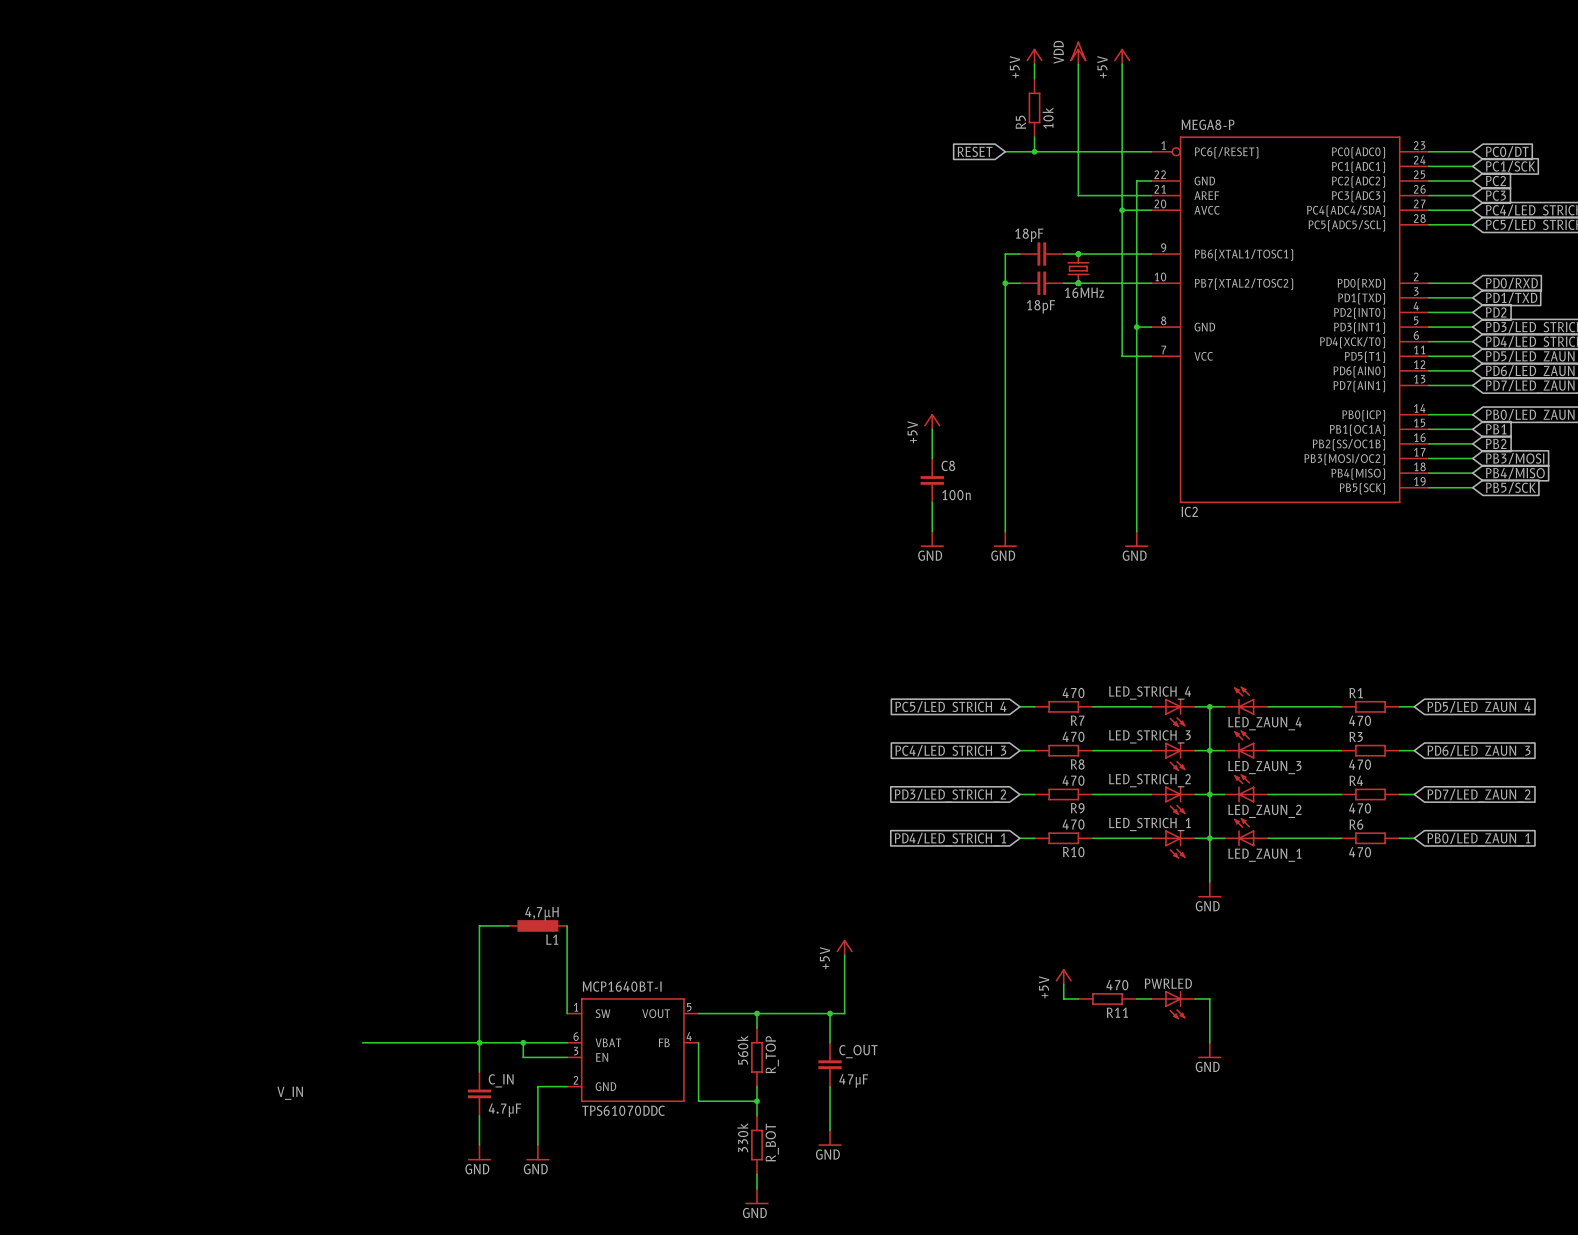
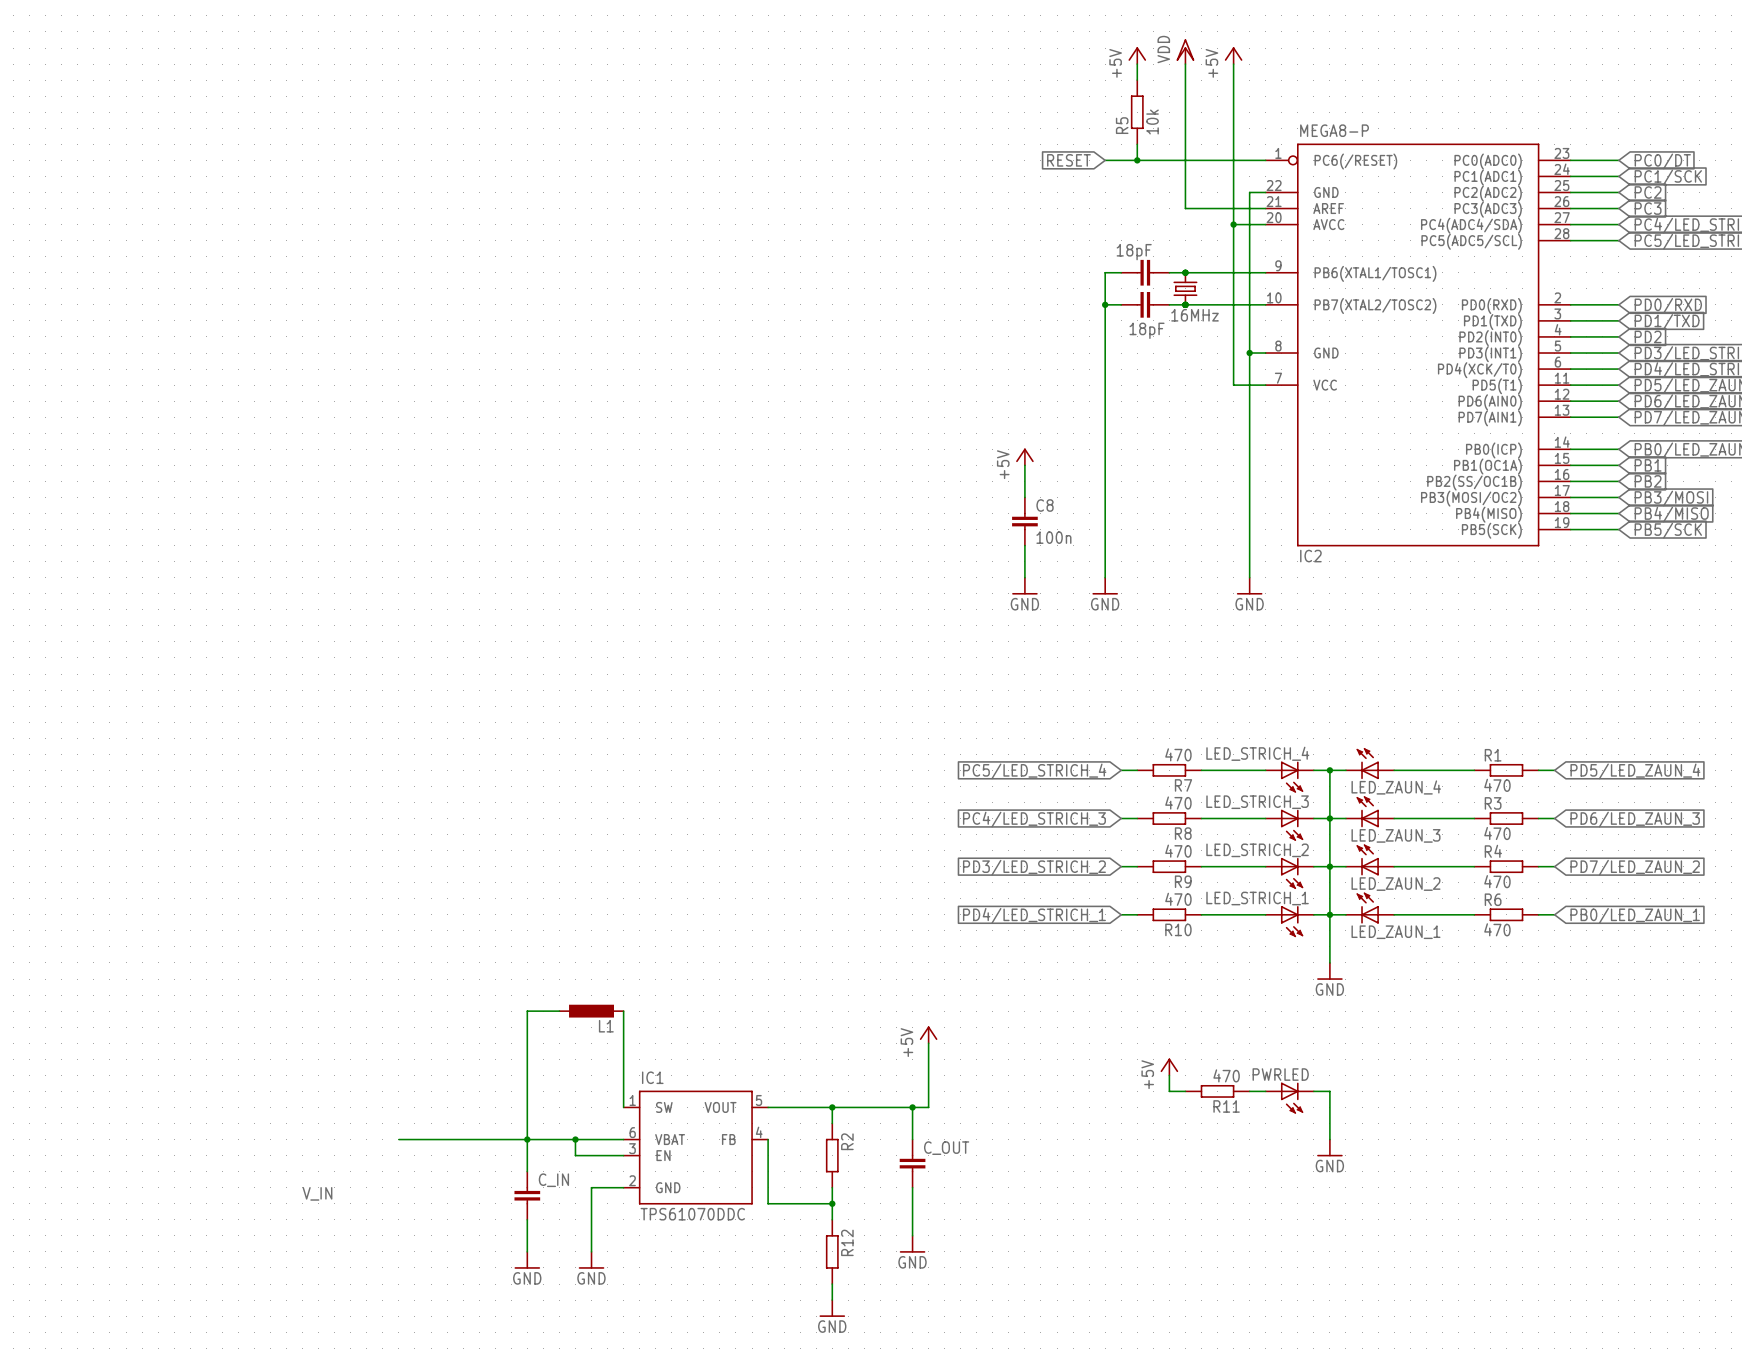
L1 value: 4,7µH (542, 913) -> none
MCP1640BT-I name: MCP1640BT-I (622, 986) -> IC1 (652, 1077)
R_TOP value: 560k (742, 1050) -> none
R_TOP name: R_TOP (772, 1054) -> R2 (847, 1141)
C_OUT value: 47μF (853, 1081) -> none
C_IN value: 4.7μF (505, 1110) -> none
R_BOT value: 330k (742, 1137) -> none
R_BOT name: R_BOT (772, 1142) -> R12 (847, 1242)

